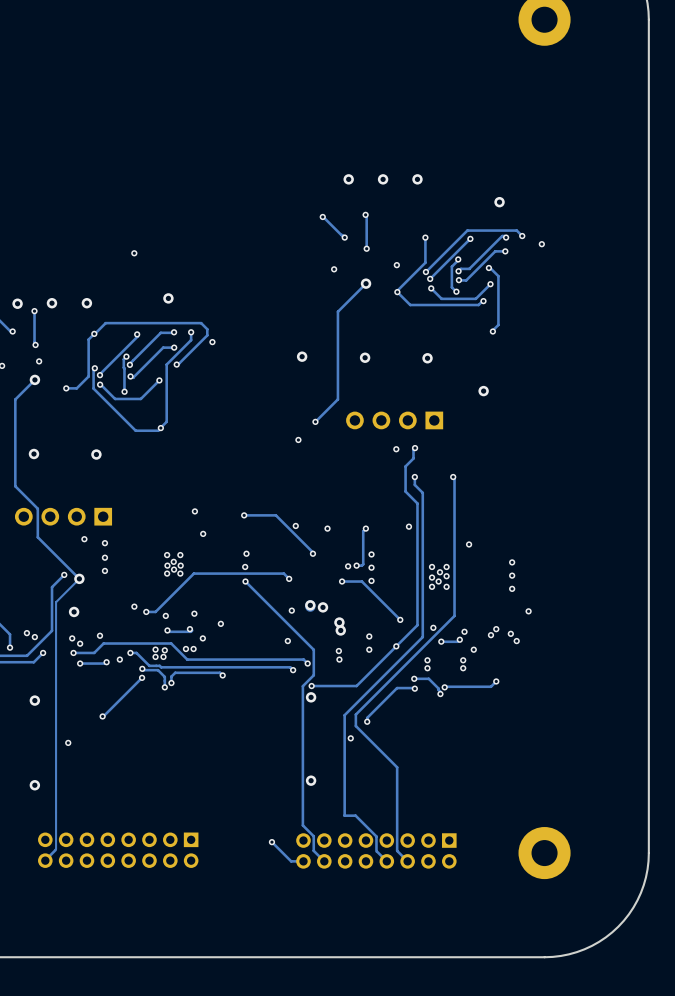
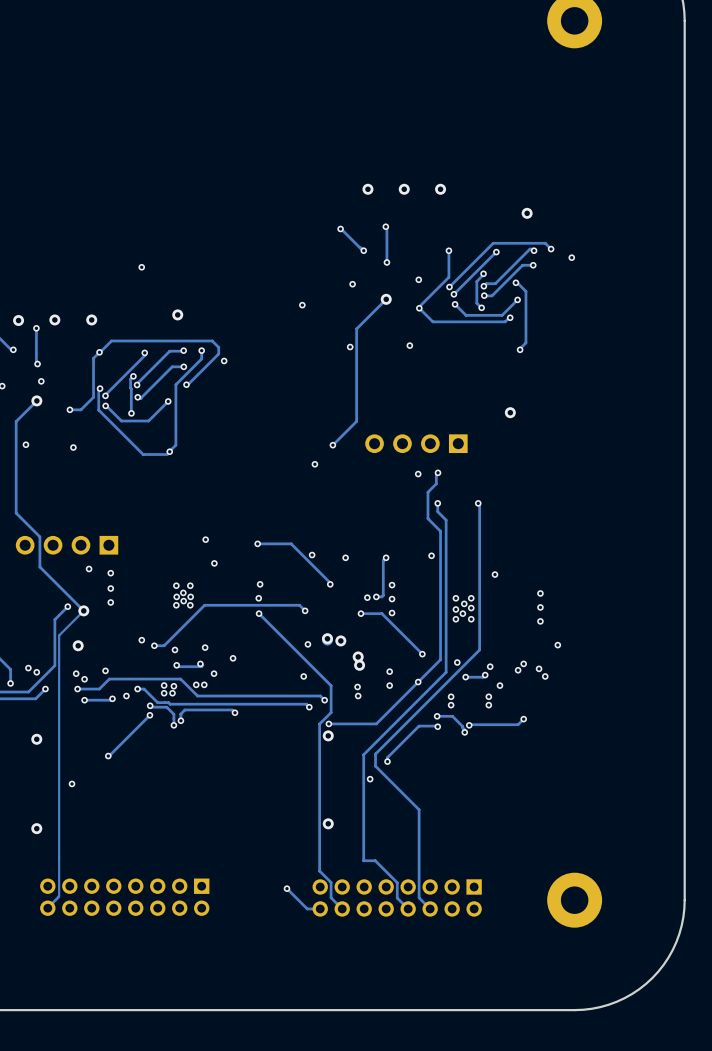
via: none -> (302, 305)
via: none -> (409, 345)
via: none -> (350, 347)
via: (302, 356) -> none
via: (365, 357) -> none
via: (427, 358) -> none
via: none -> (25, 444)
via: none -> (73, 447)
via: (33, 453) -> none
via: (96, 454) -> none

